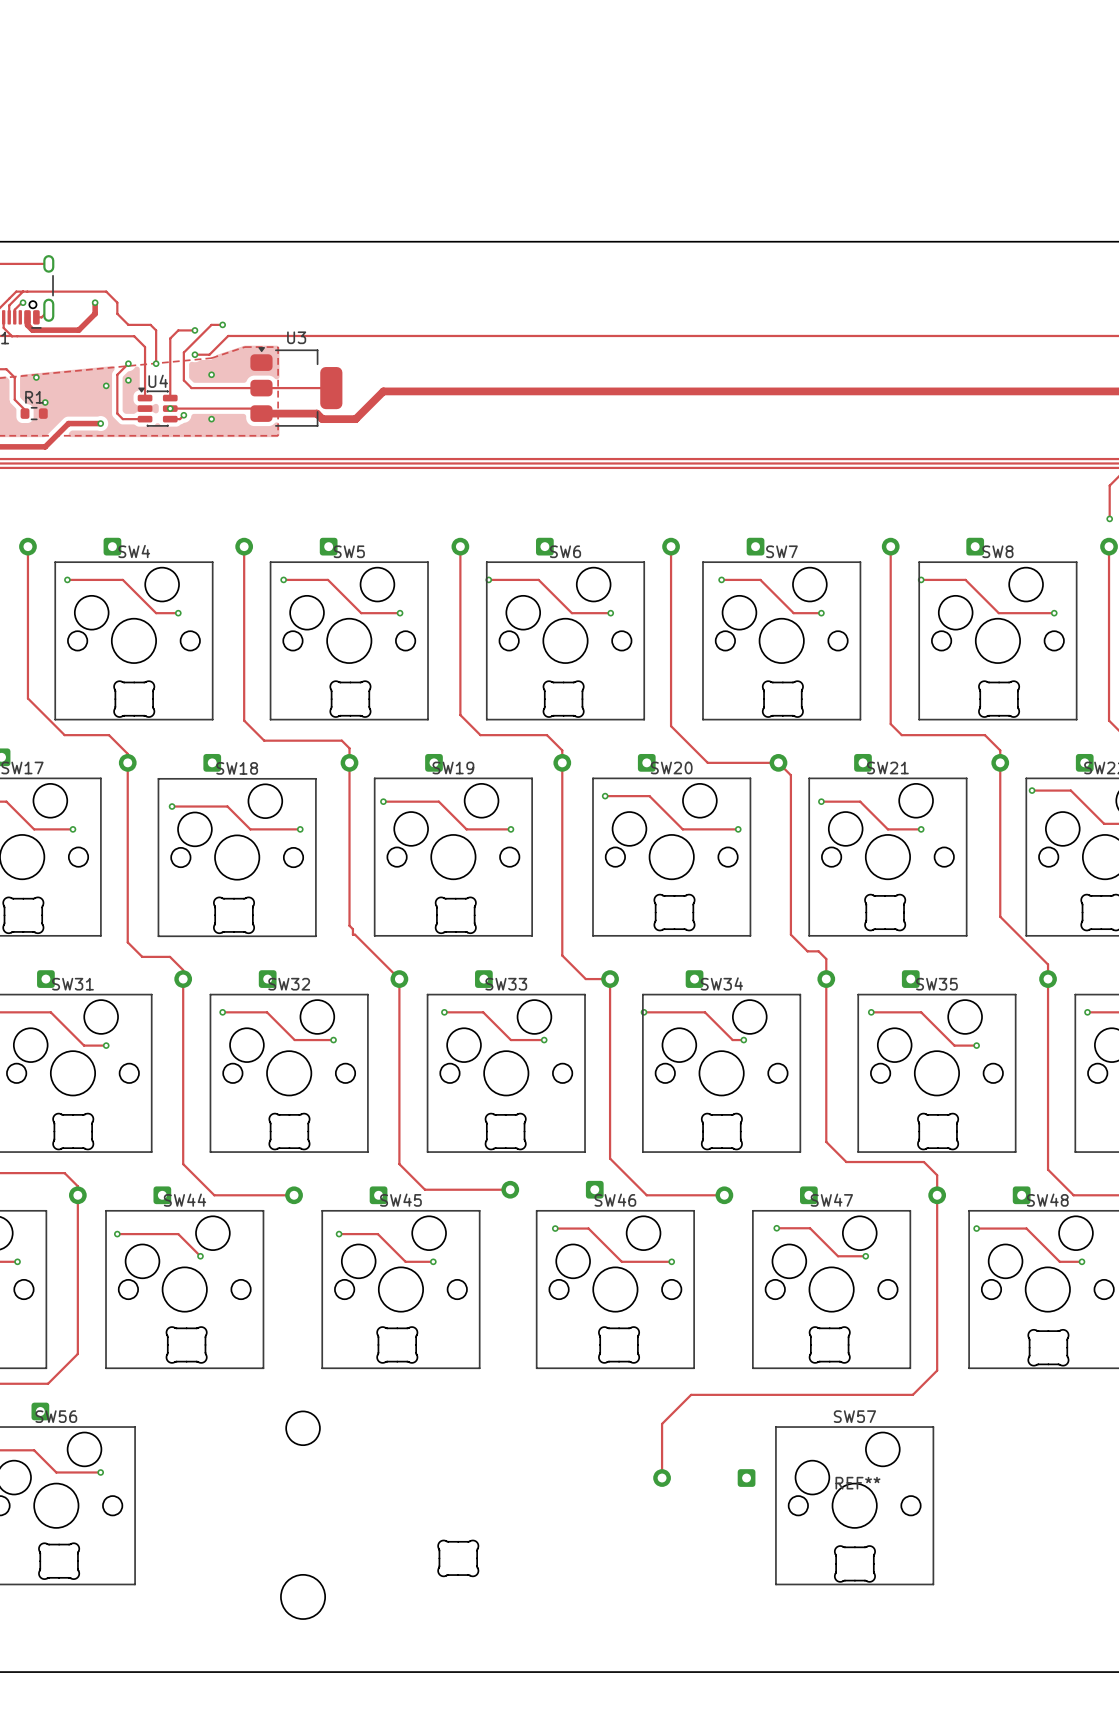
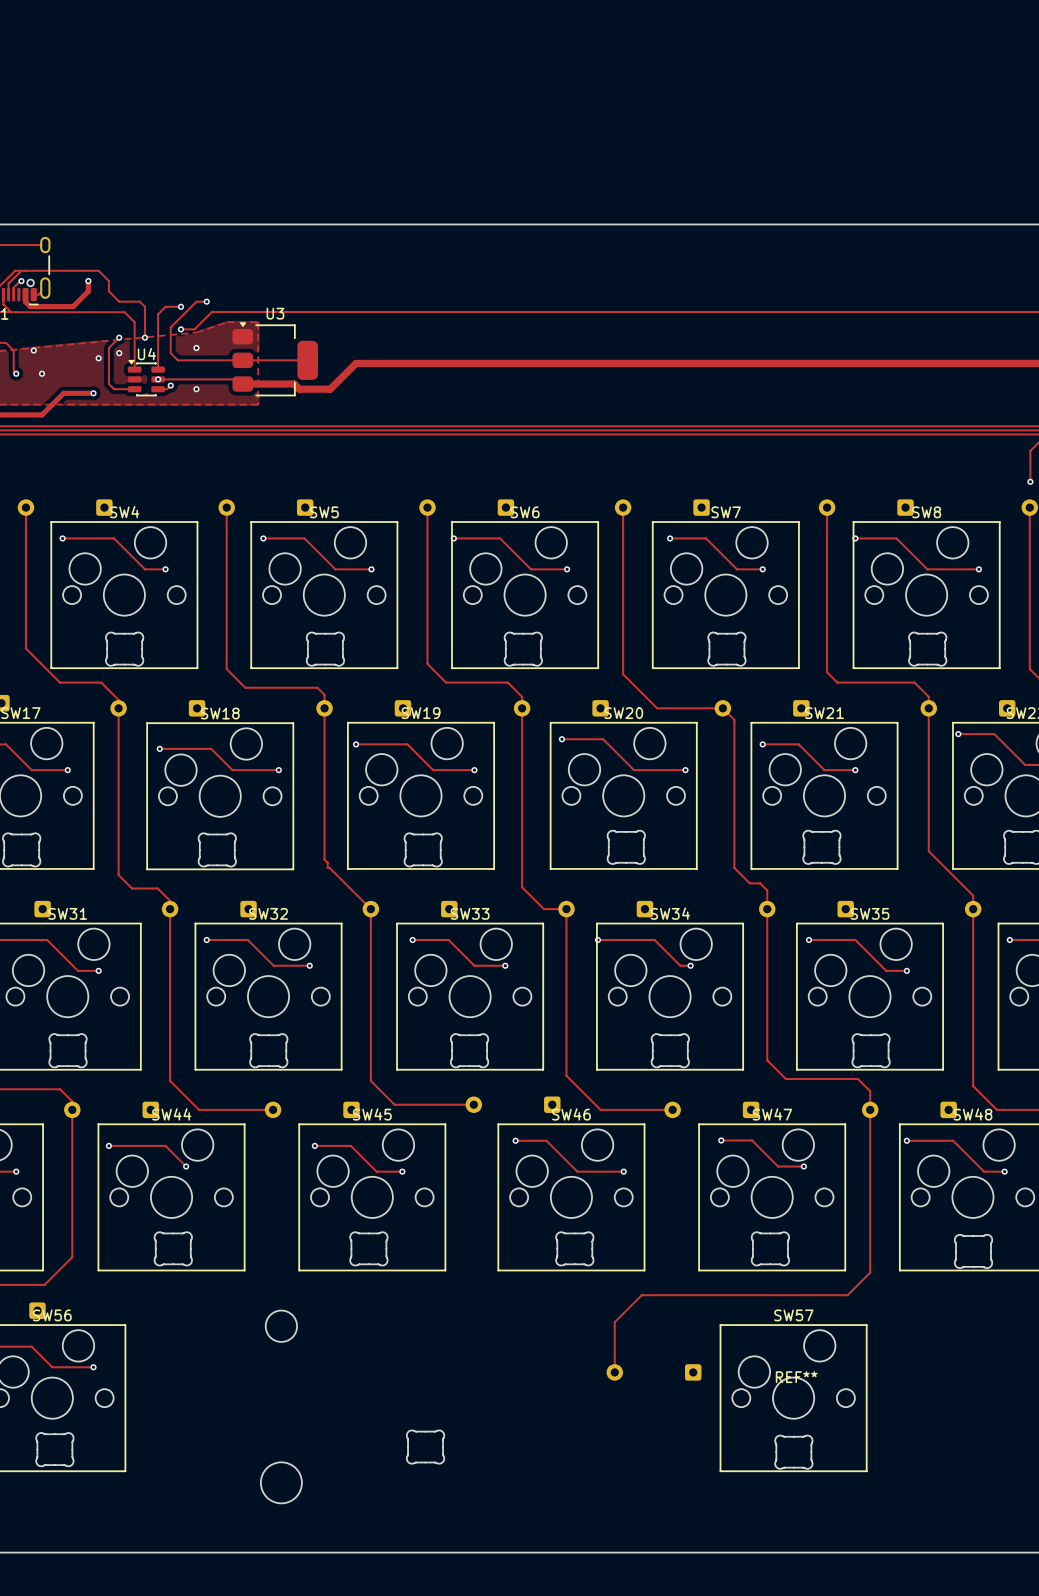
track: (17, 402) (25, 409) (25, 413) -> none
via: none -> (16, 373)
R1: (34, 413) -> none

